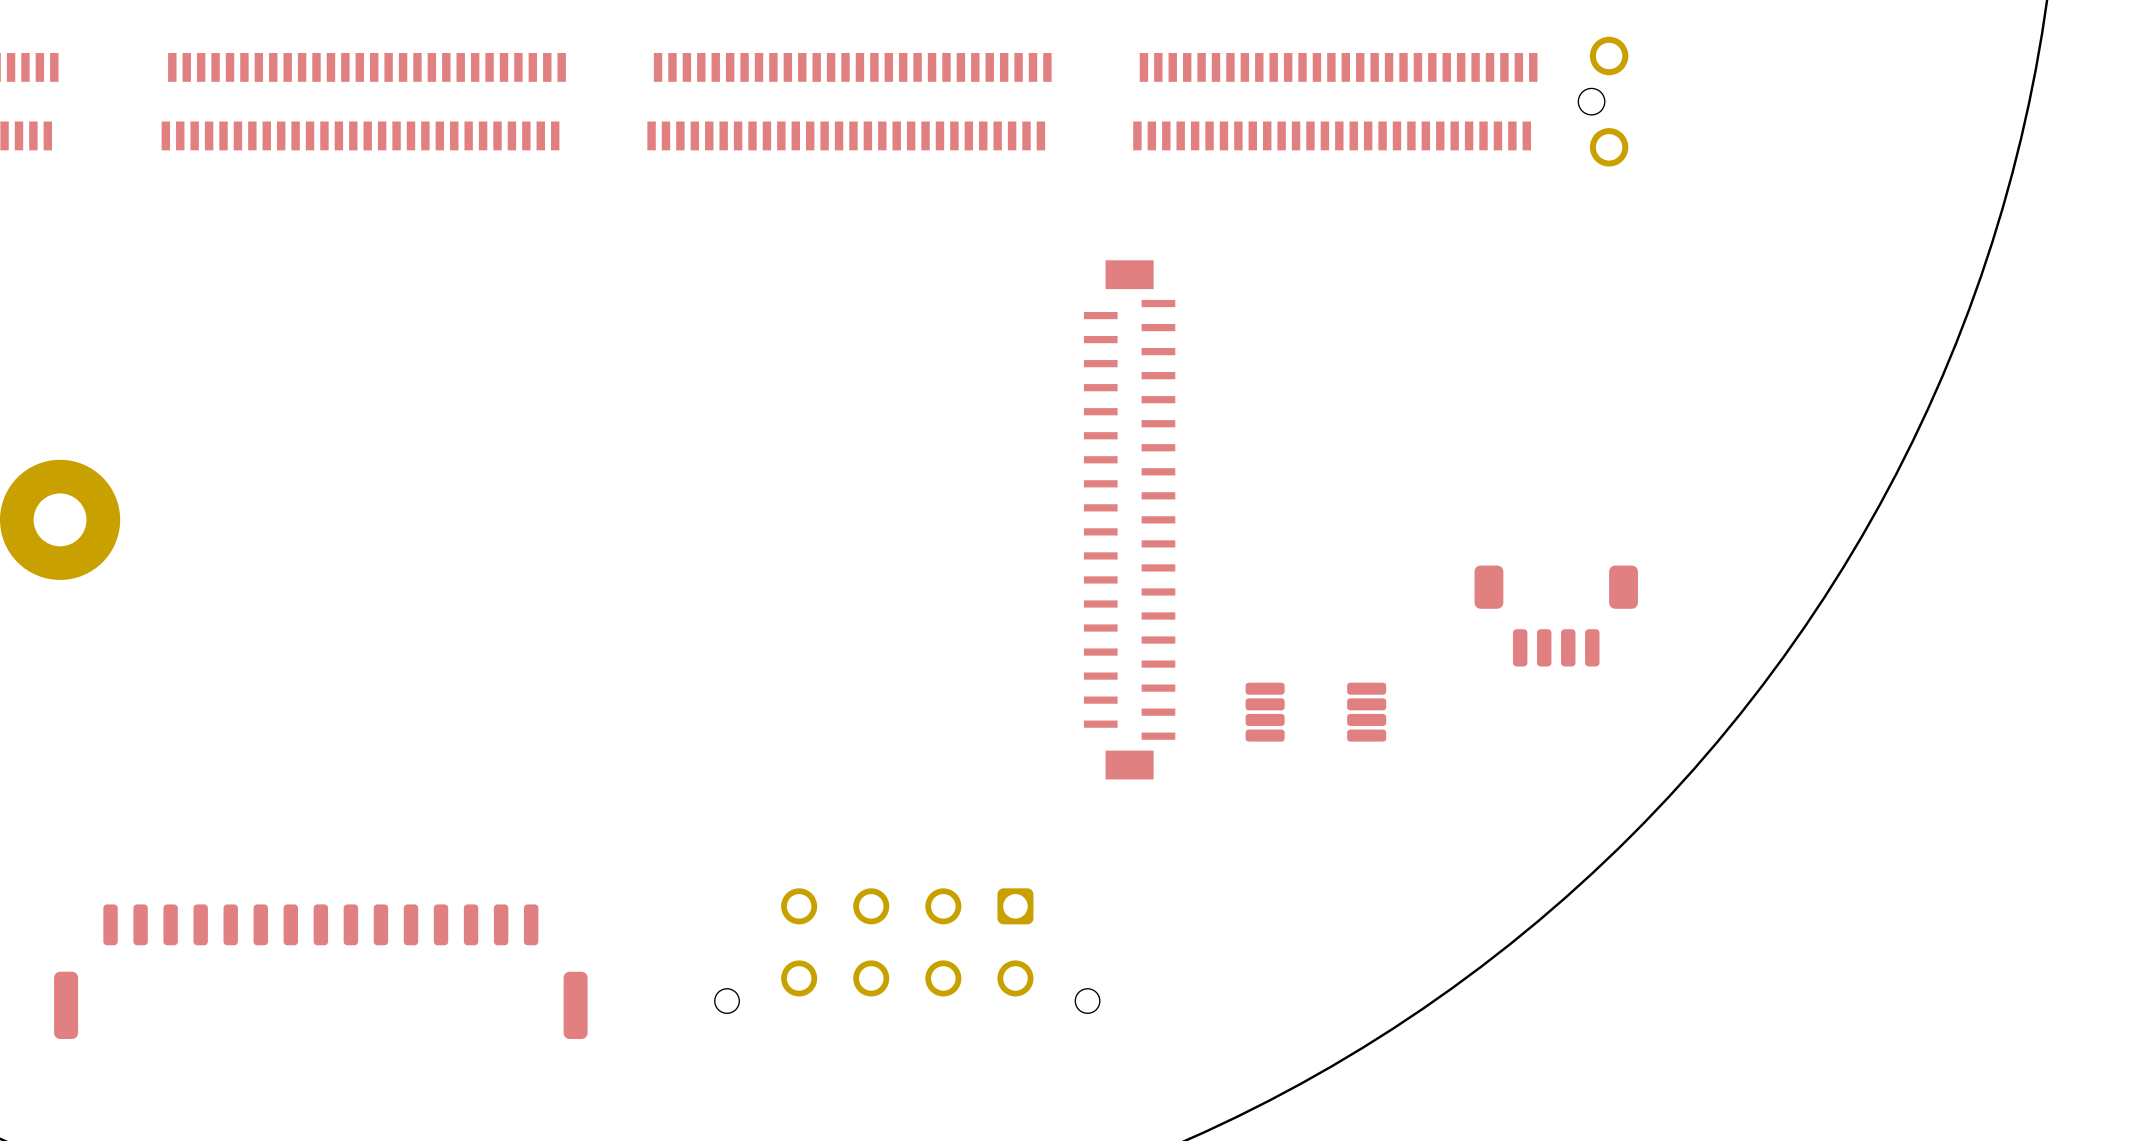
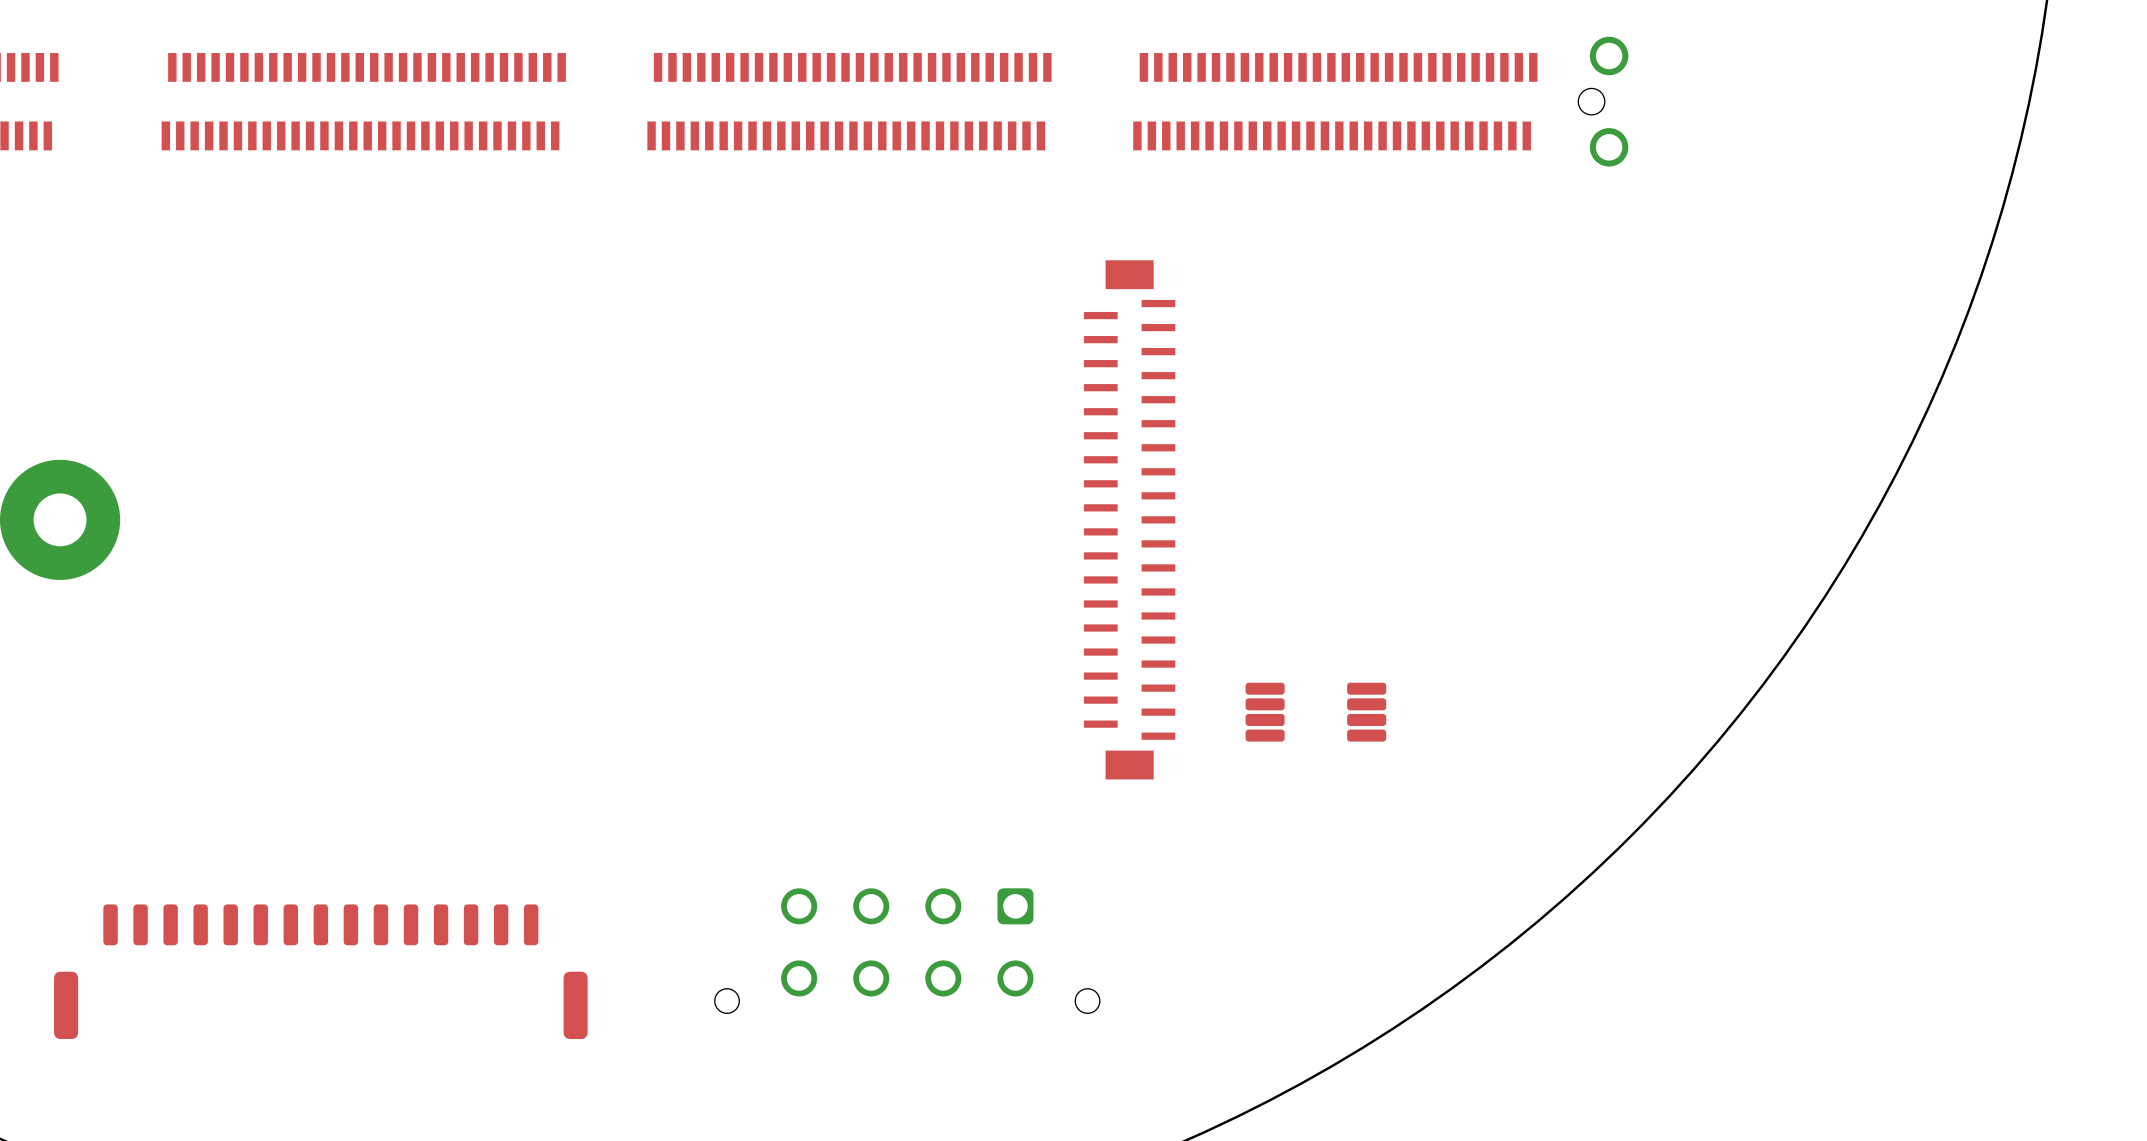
part: (1556, 616) -> none

